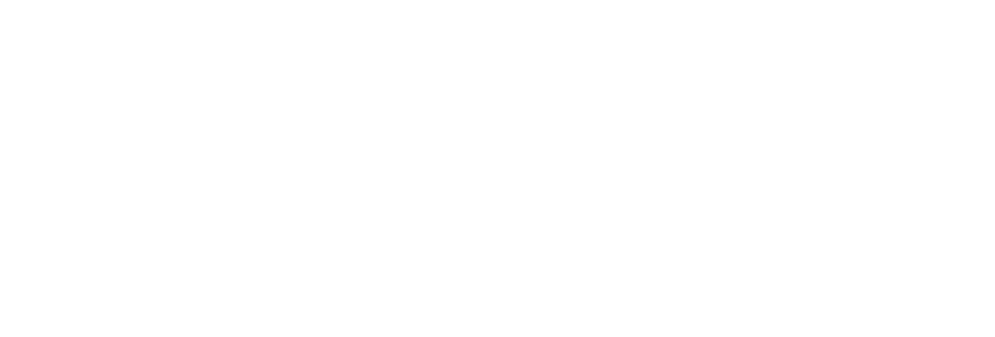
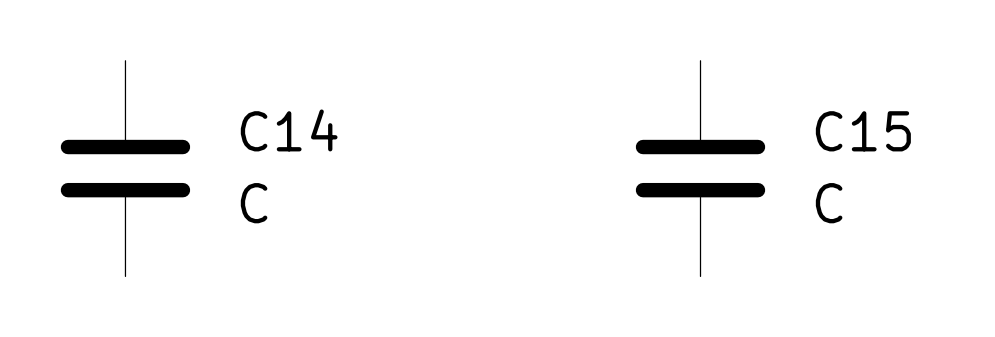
C14: none -> C (125, 168)
C15: none -> C (700, 168)

